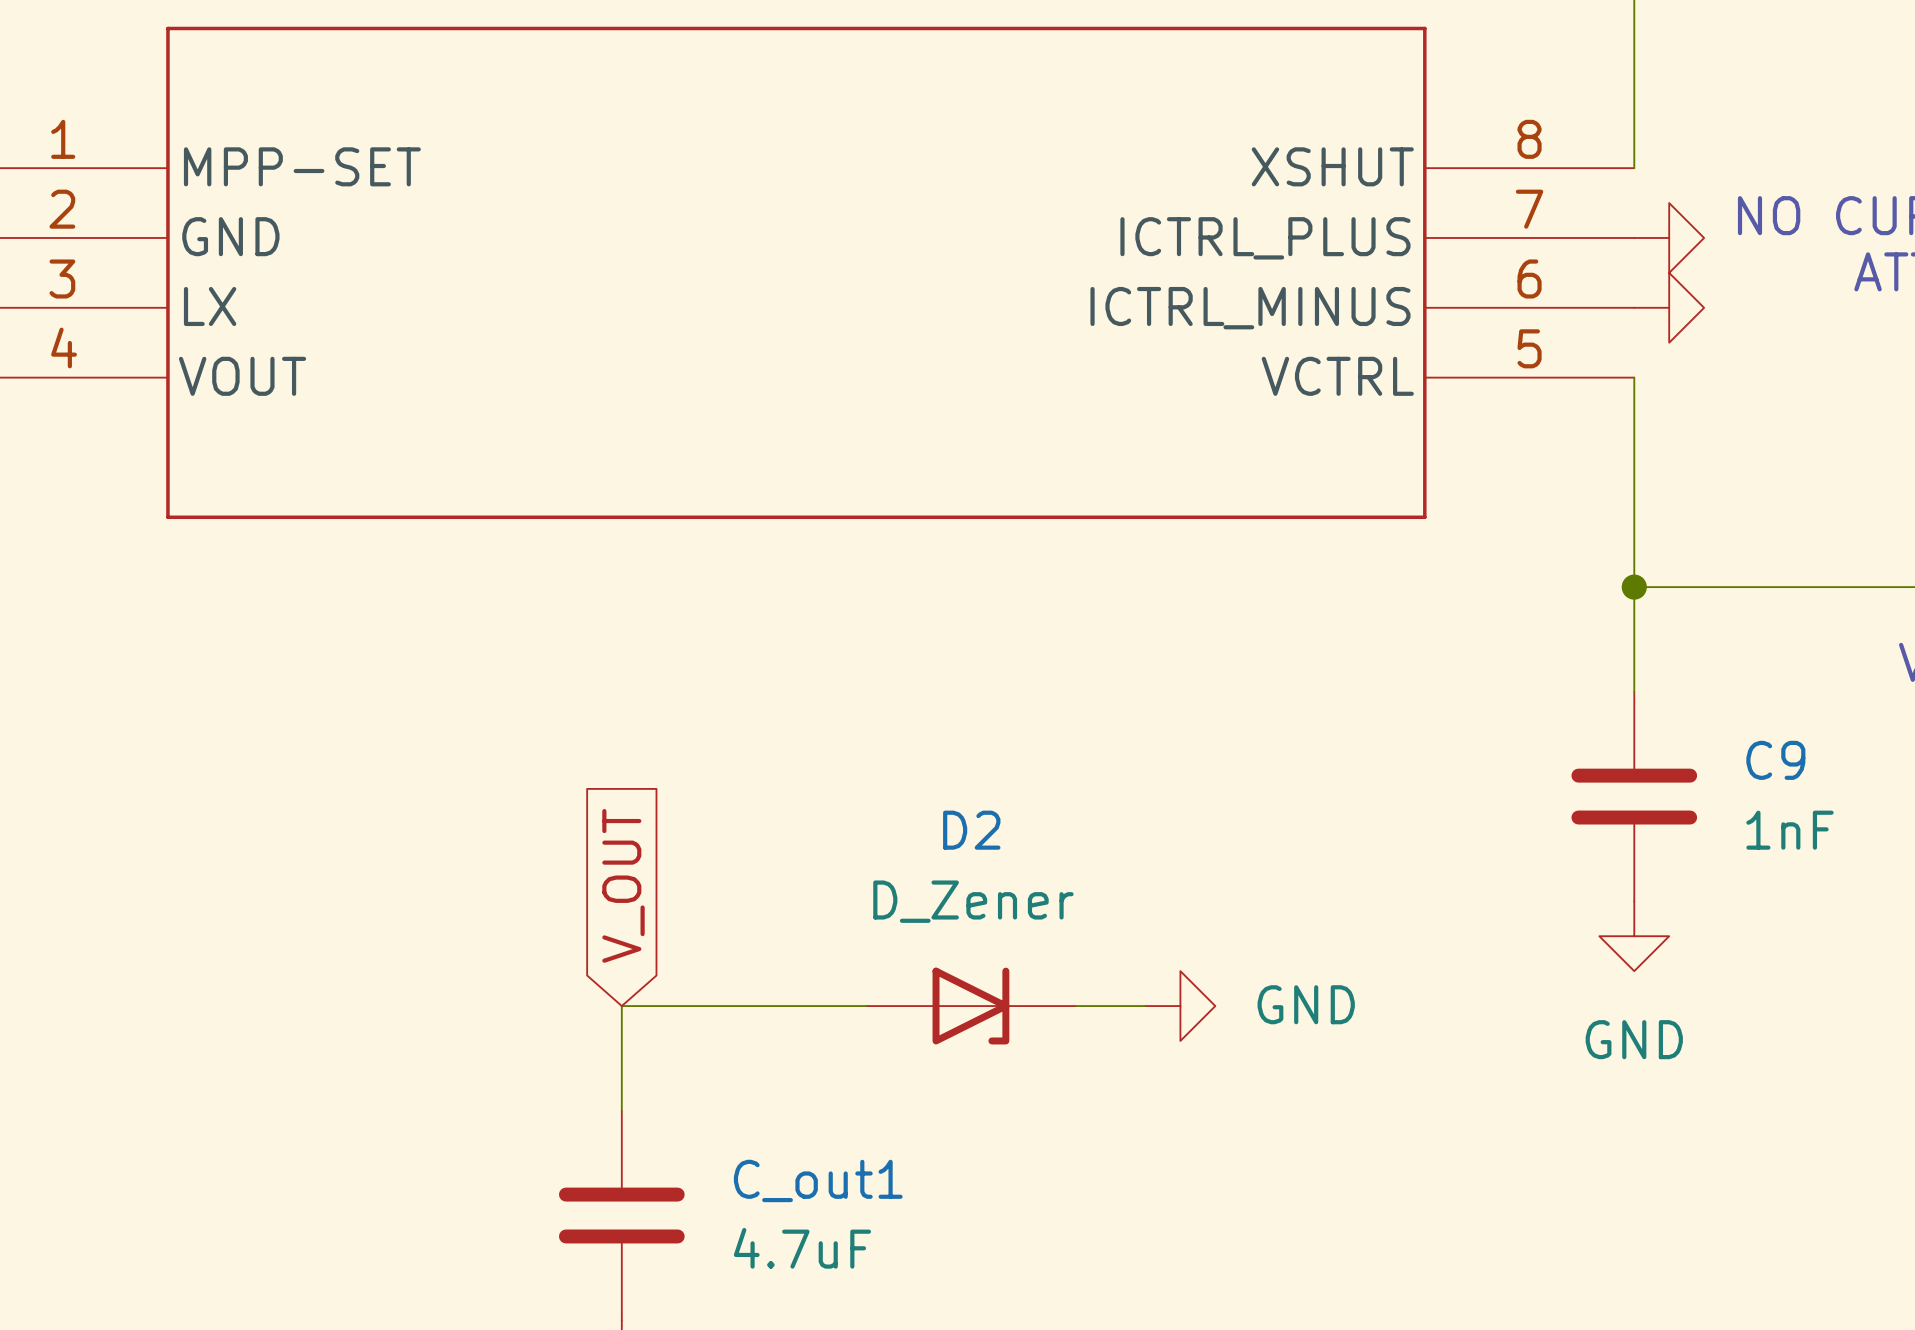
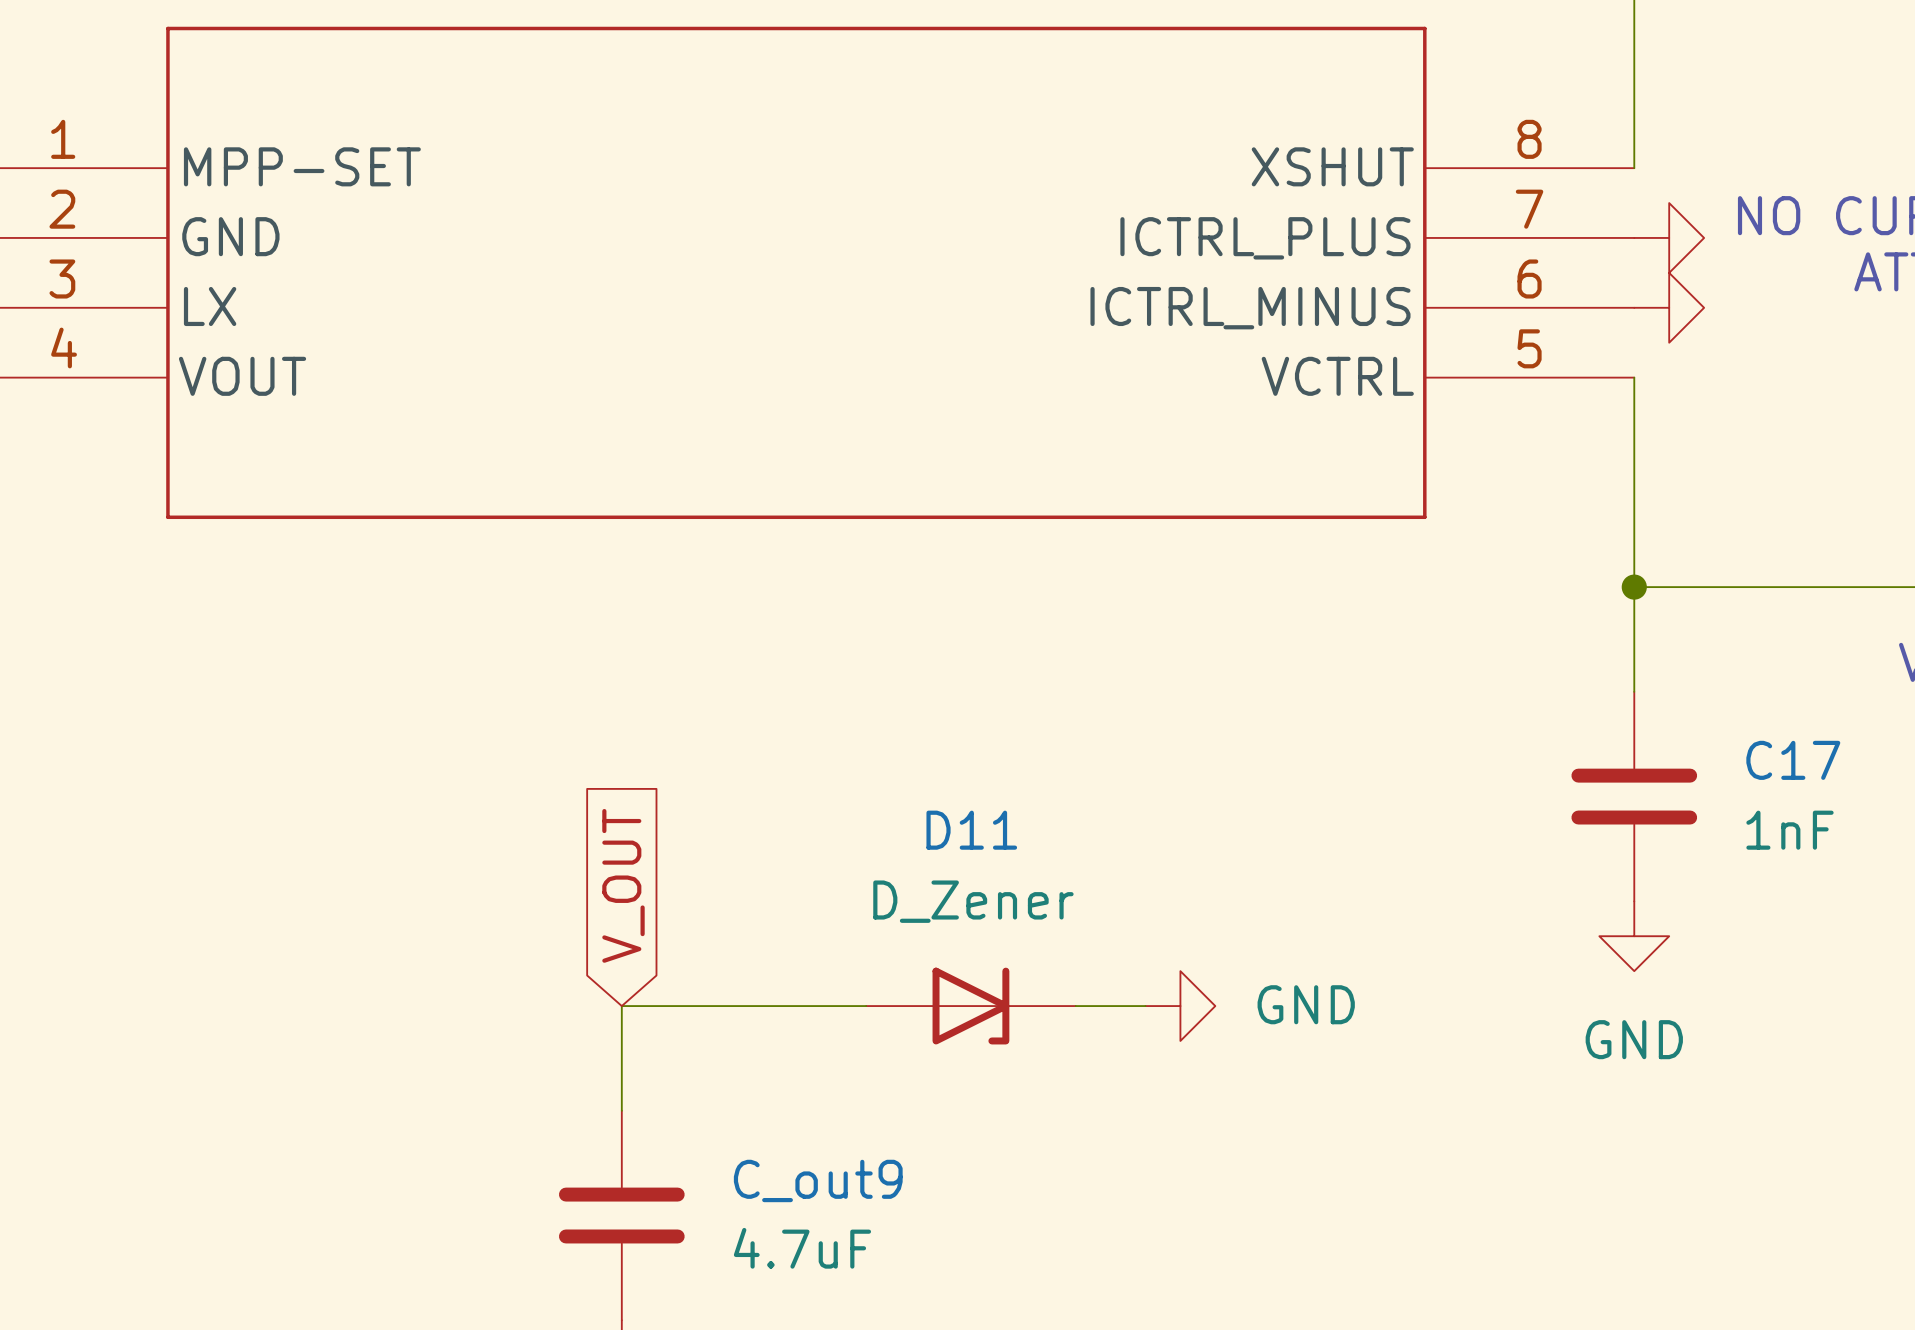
C9 name: C9 (1775, 760) -> C17 (1793, 760)
D2 name: D2 (971, 830) -> D11 (971, 830)
C_out1 name: C_out1 (818, 1180) -> C_out9 (818, 1180)

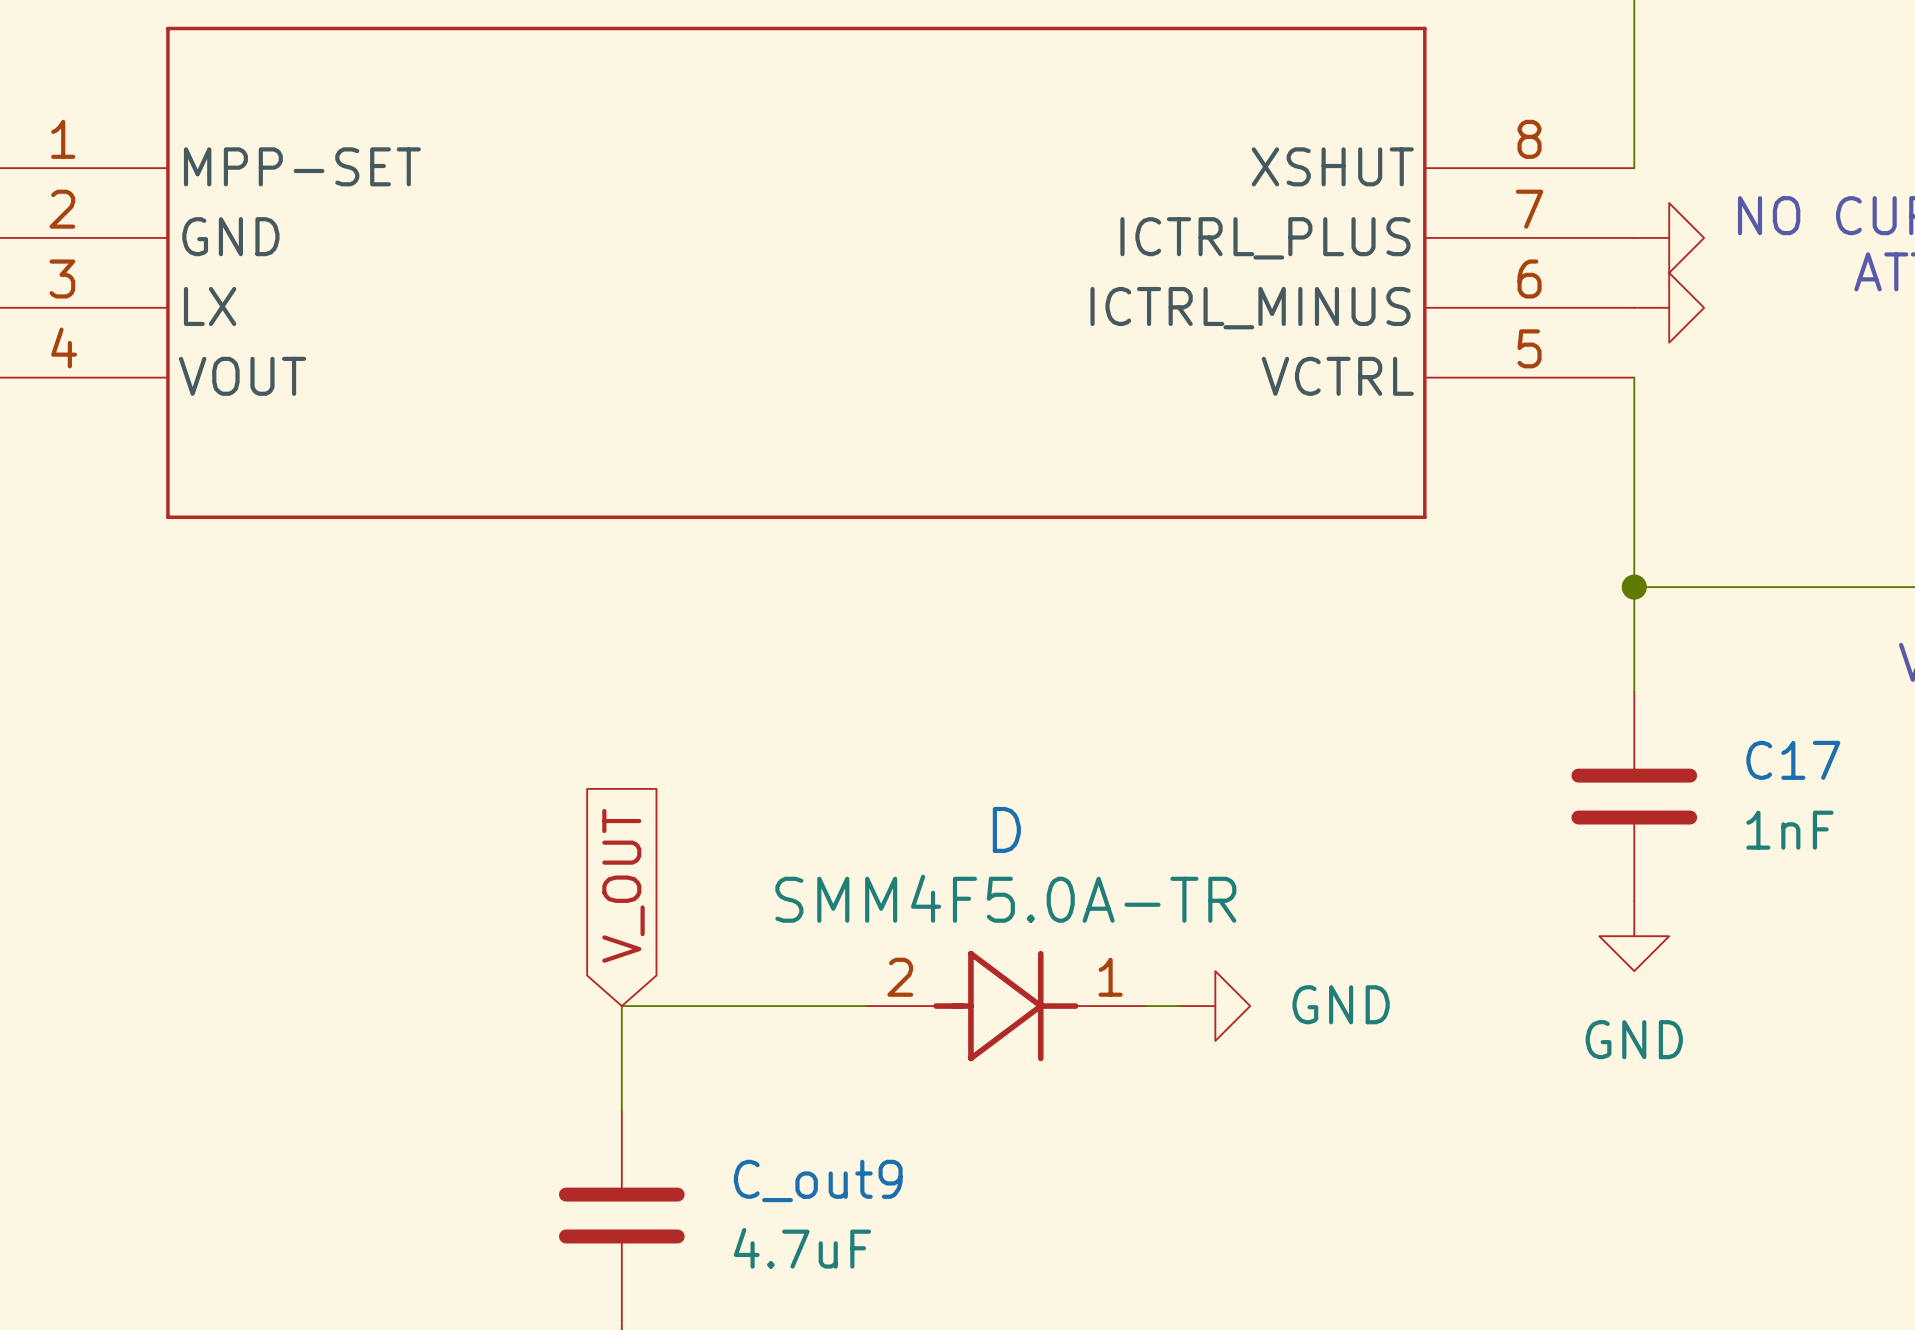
D11: D_Zener (970, 1006) -> none
D: none -> SMM4F5.0A-TR (1005, 1006)
power symbol position: GND (1180, 1006) -> GND (1215, 1006)

